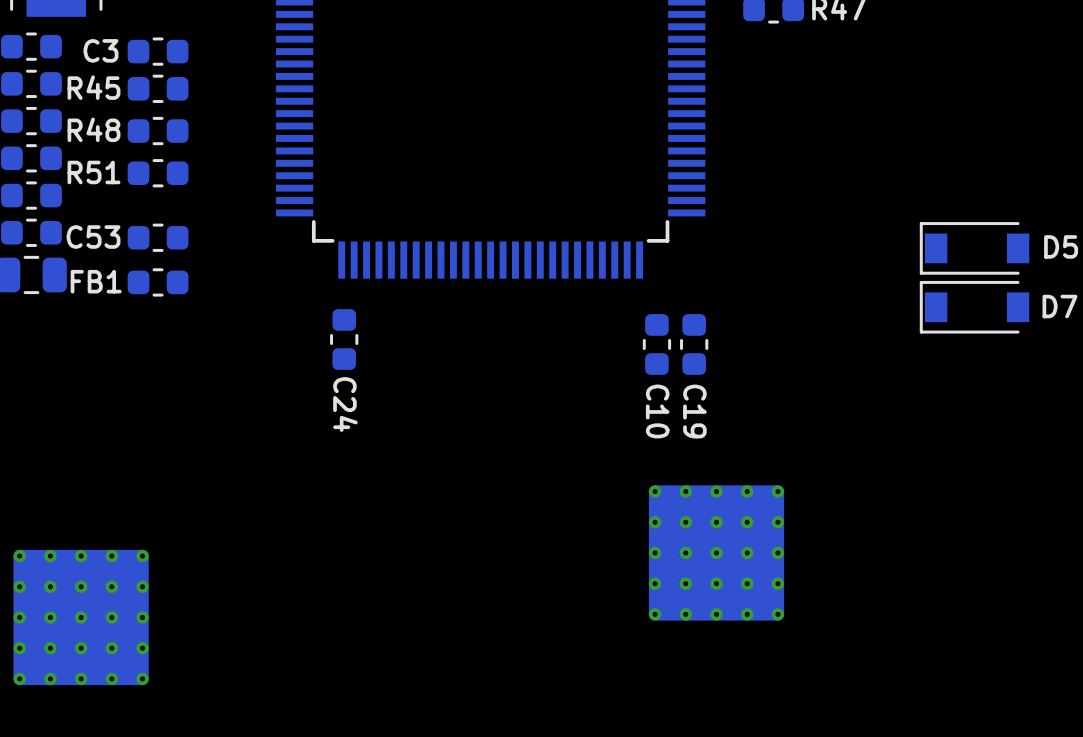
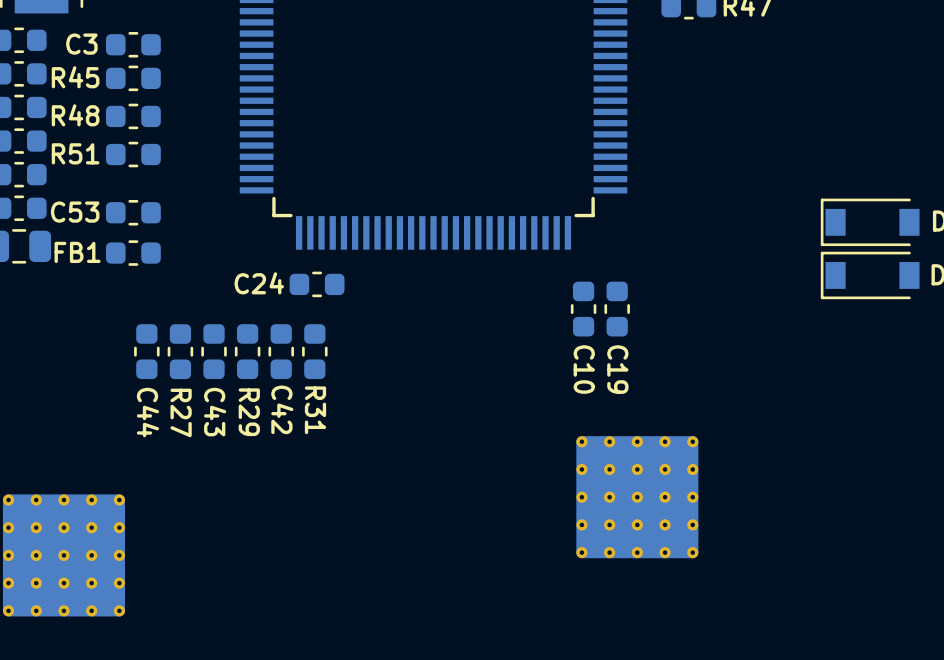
C24 rotation: 0° (344, 339) -> 90° clockwise (317, 284)
C44: none -> (146, 351)
R27: none -> (180, 351)
C43: none -> (214, 351)
R29: none -> (247, 351)
C42: none -> (281, 351)
R31: none -> (314, 351)

